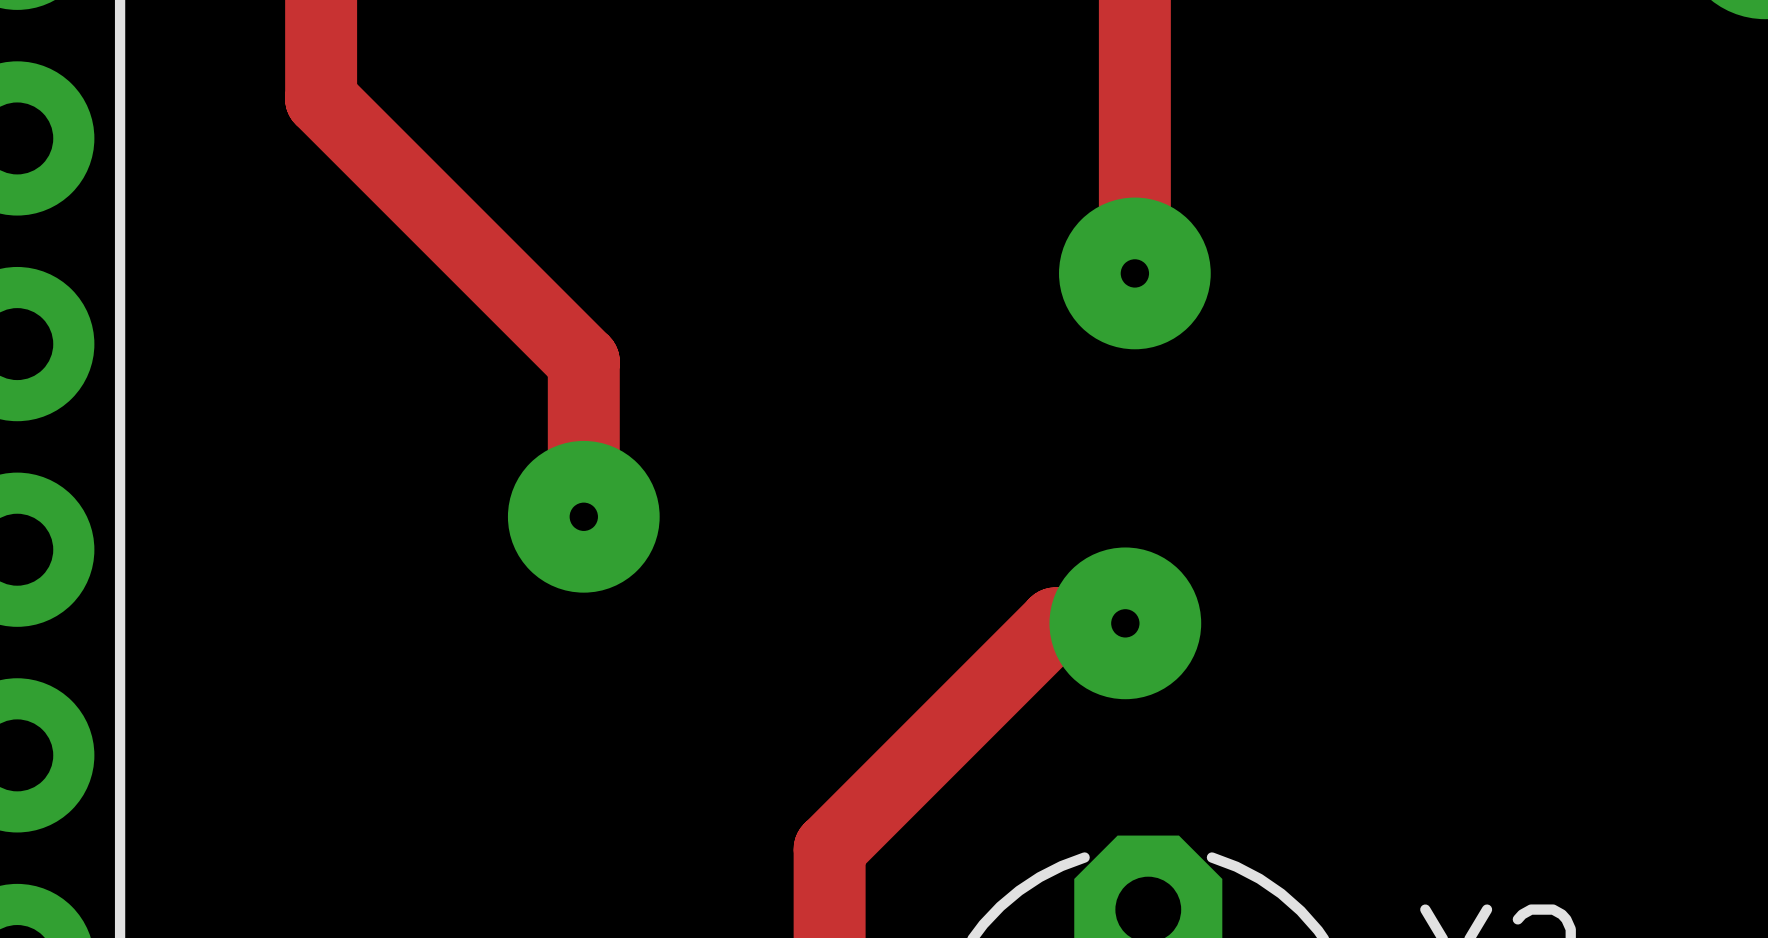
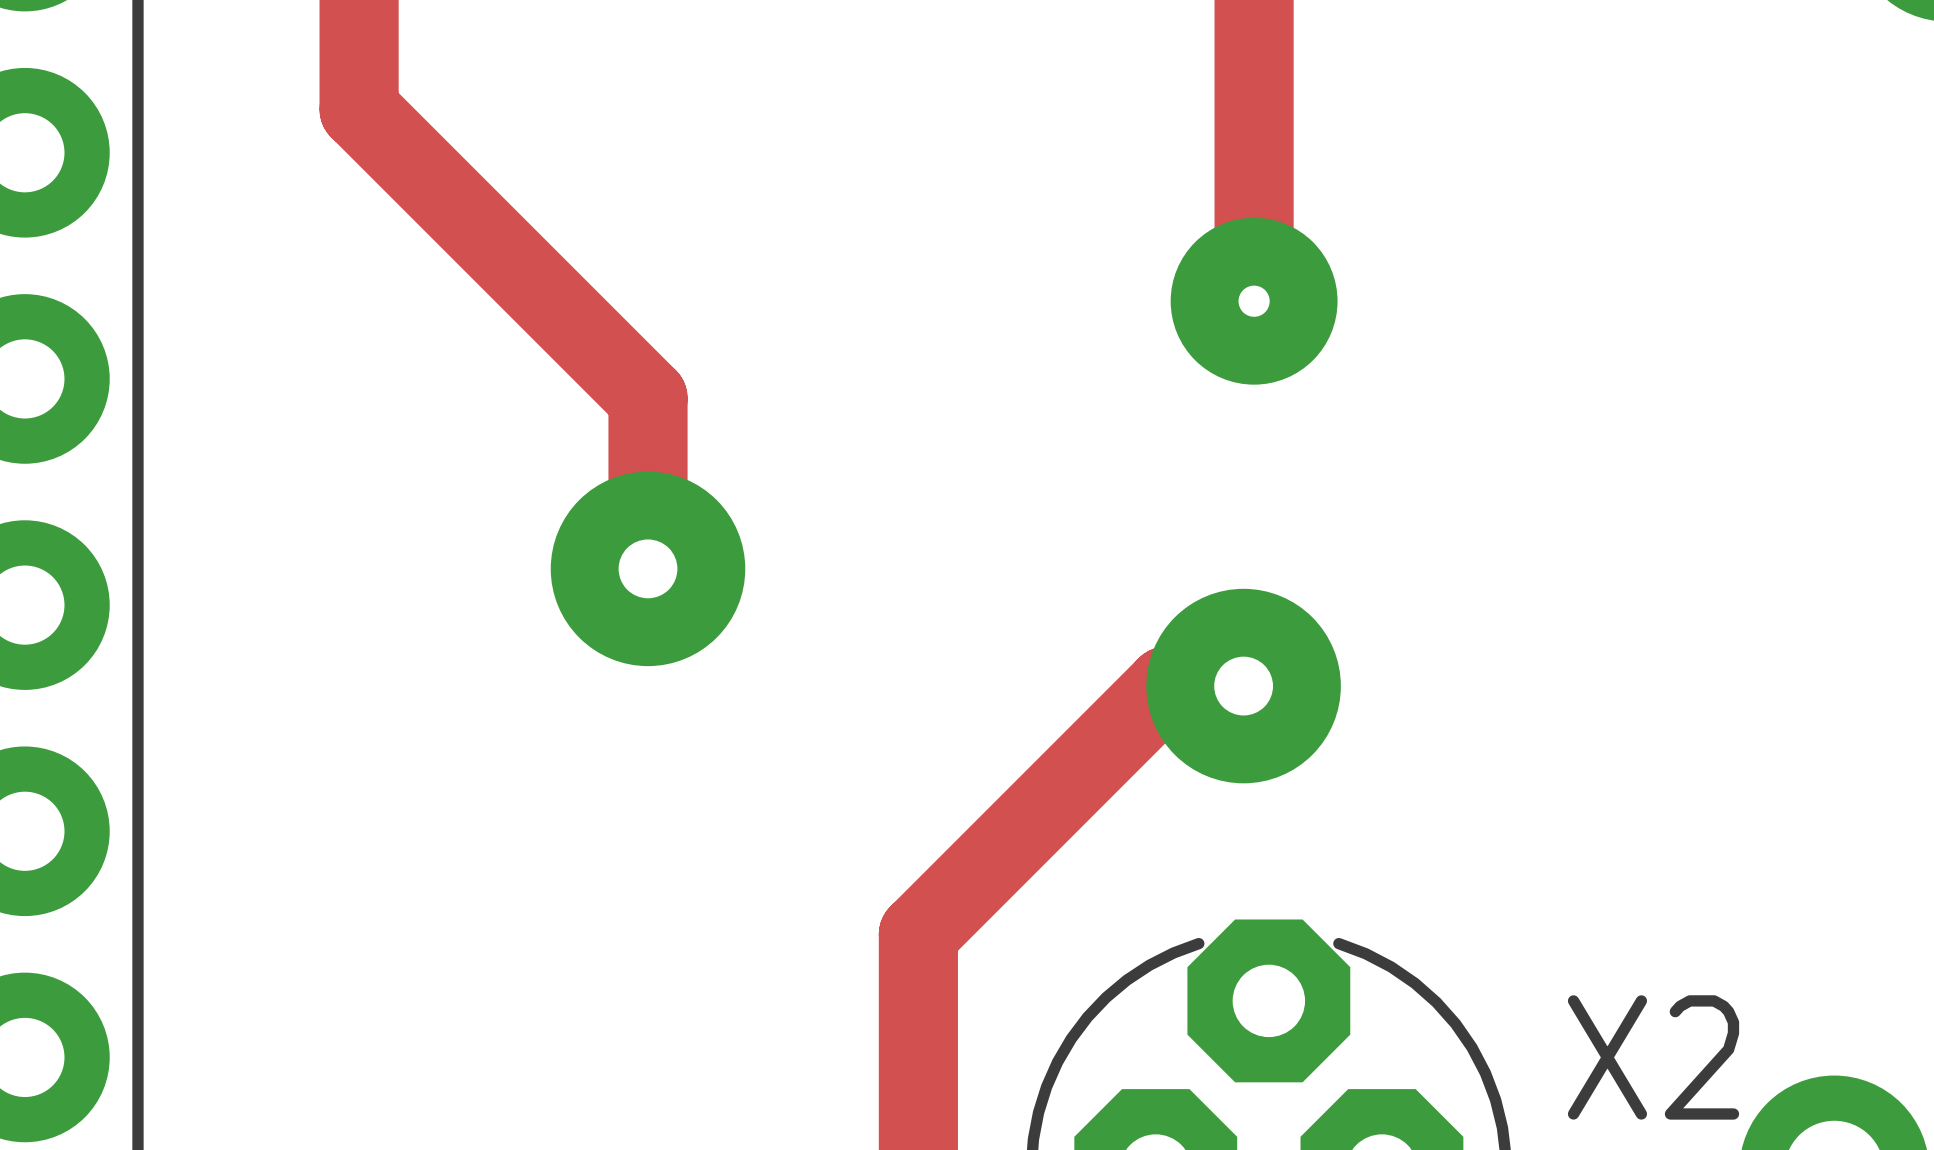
via size: [507, 440, 660, 593] -> [550, 471, 746, 667]
via size: [1049, 547, 1202, 700] -> [1146, 588, 1341, 784]

